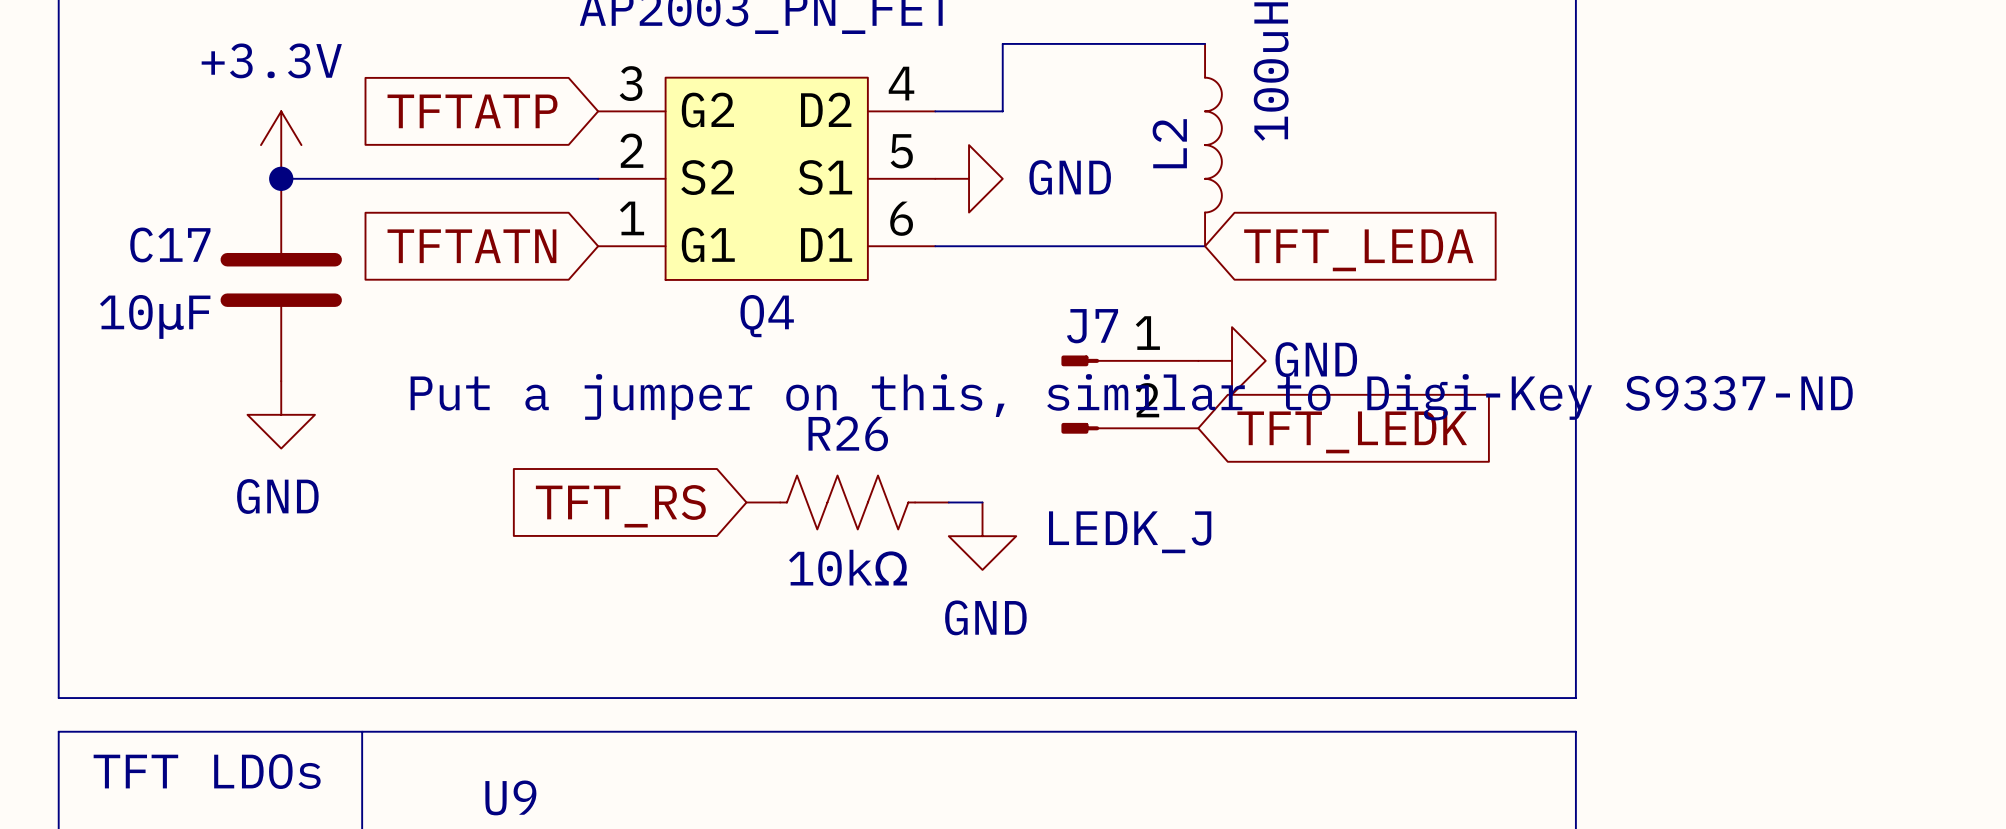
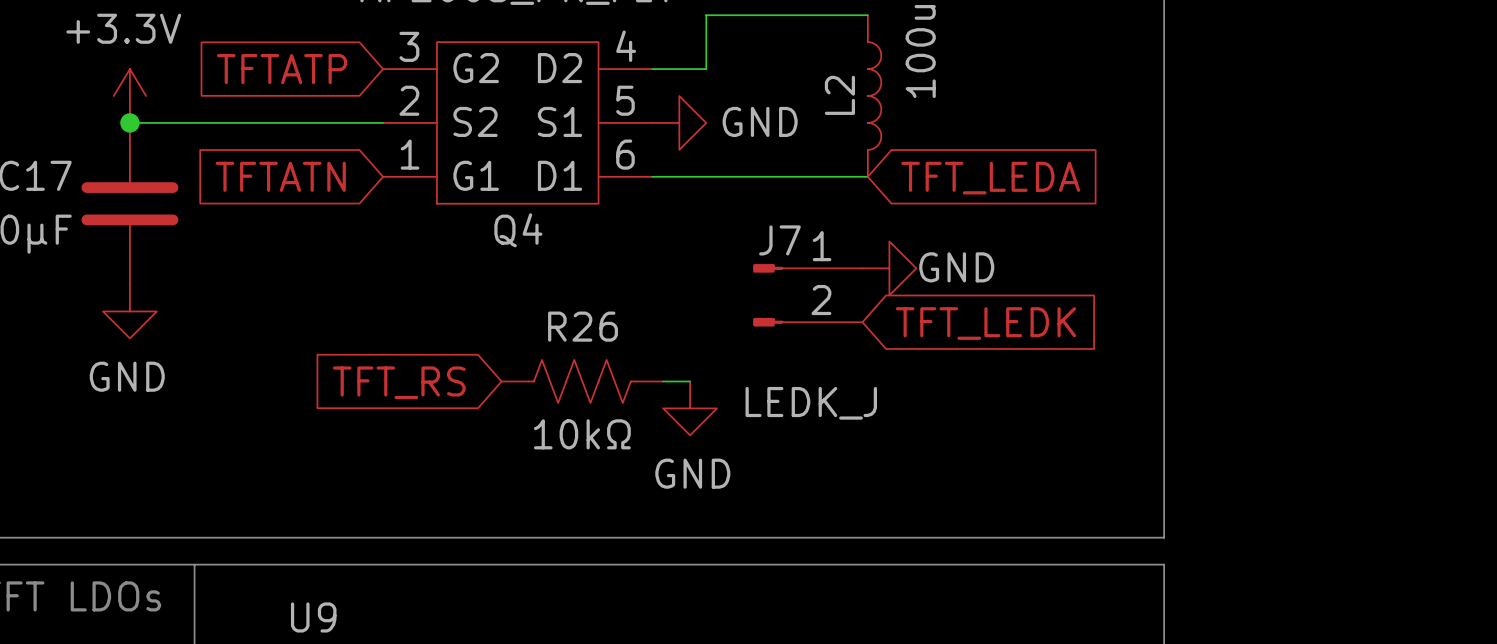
J7 text: Put a jumper on this, similar to Digi-Key S9337-ND (1131, 397) -> none

